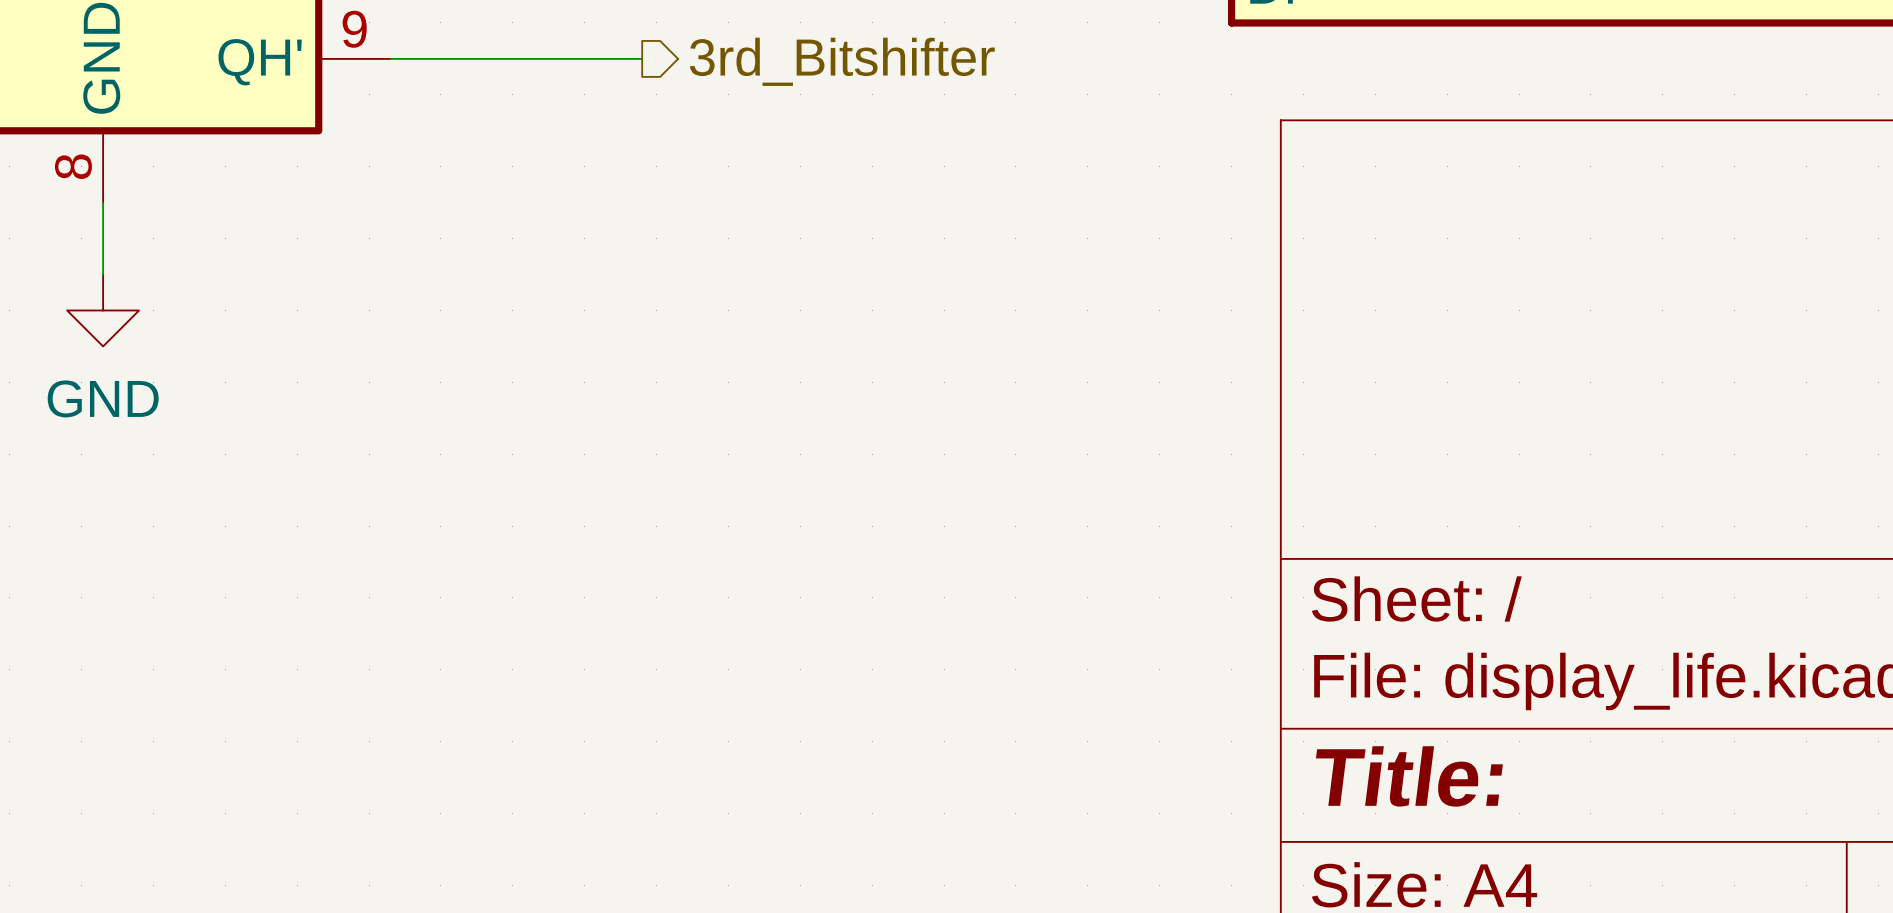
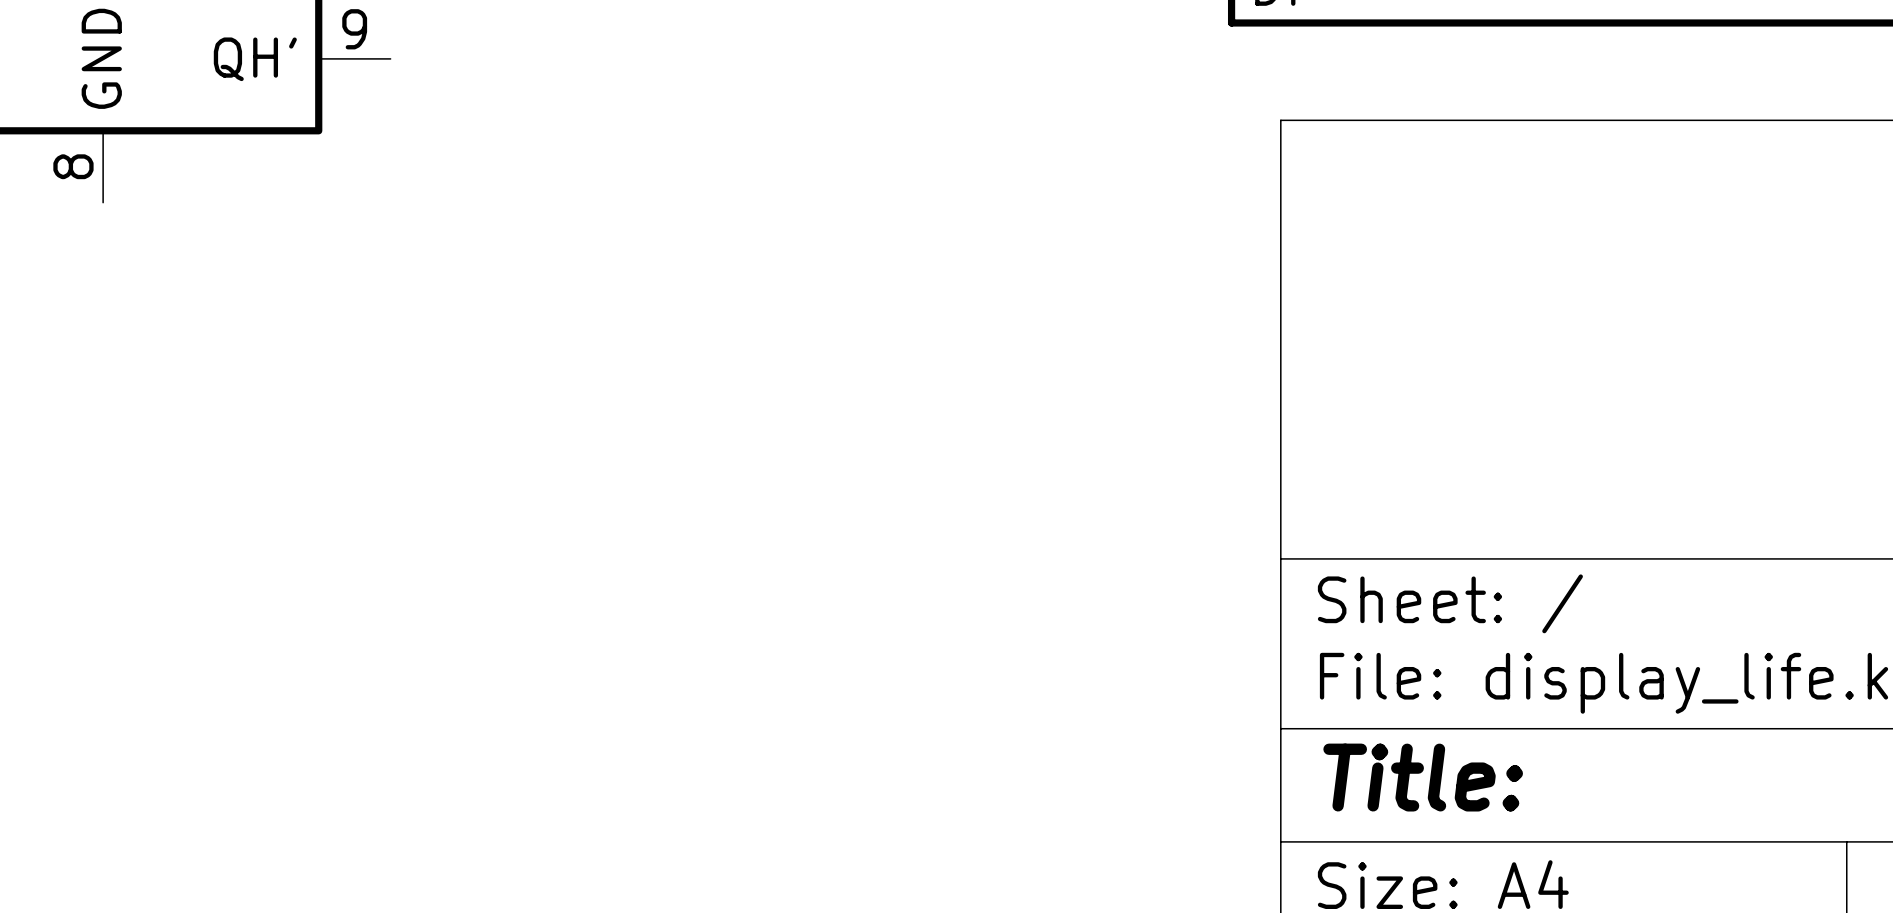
wire: (390, 58) (642, 58) -> none
hierarchical label: 3rd_Bitshifter (842, 61) -> none
wire: (103, 202) (103, 274) -> none
power symbol: GND (103, 310) -> none

